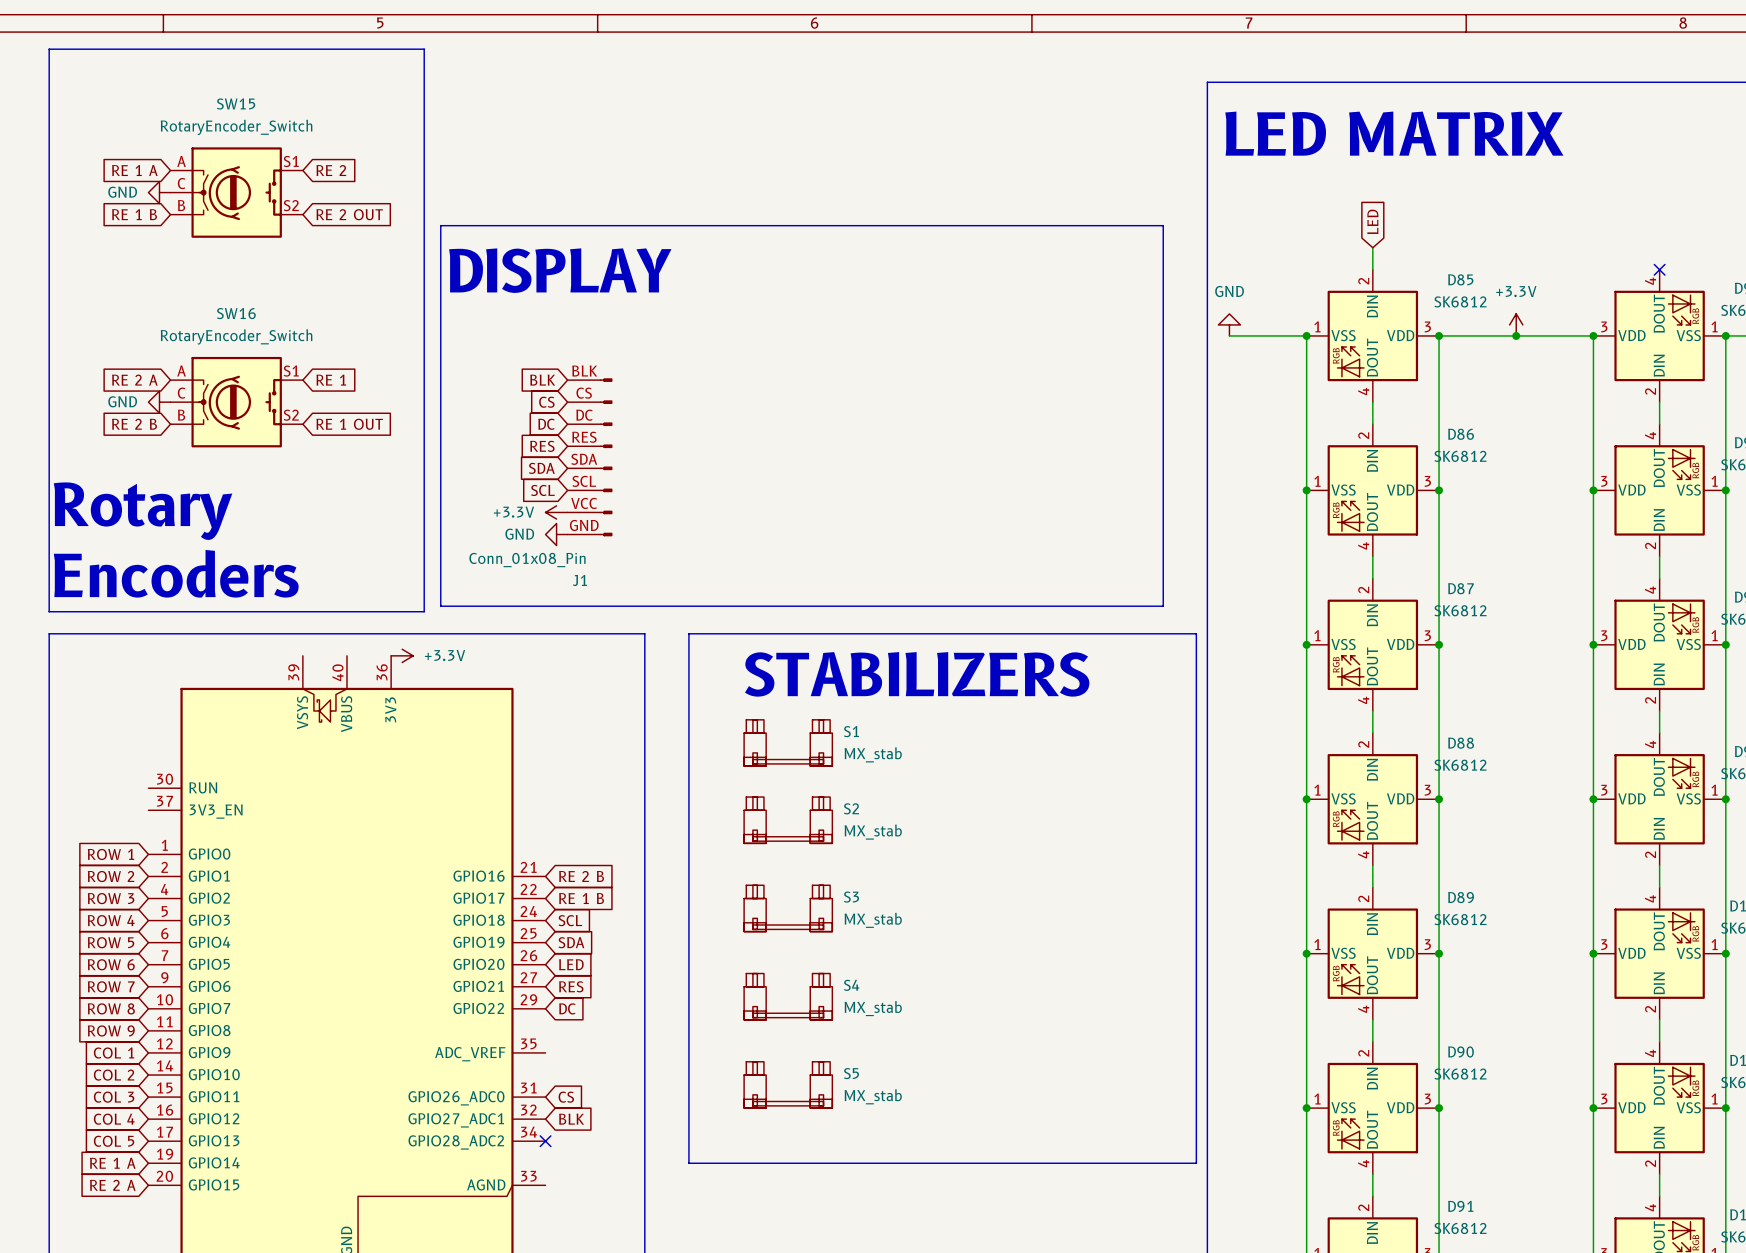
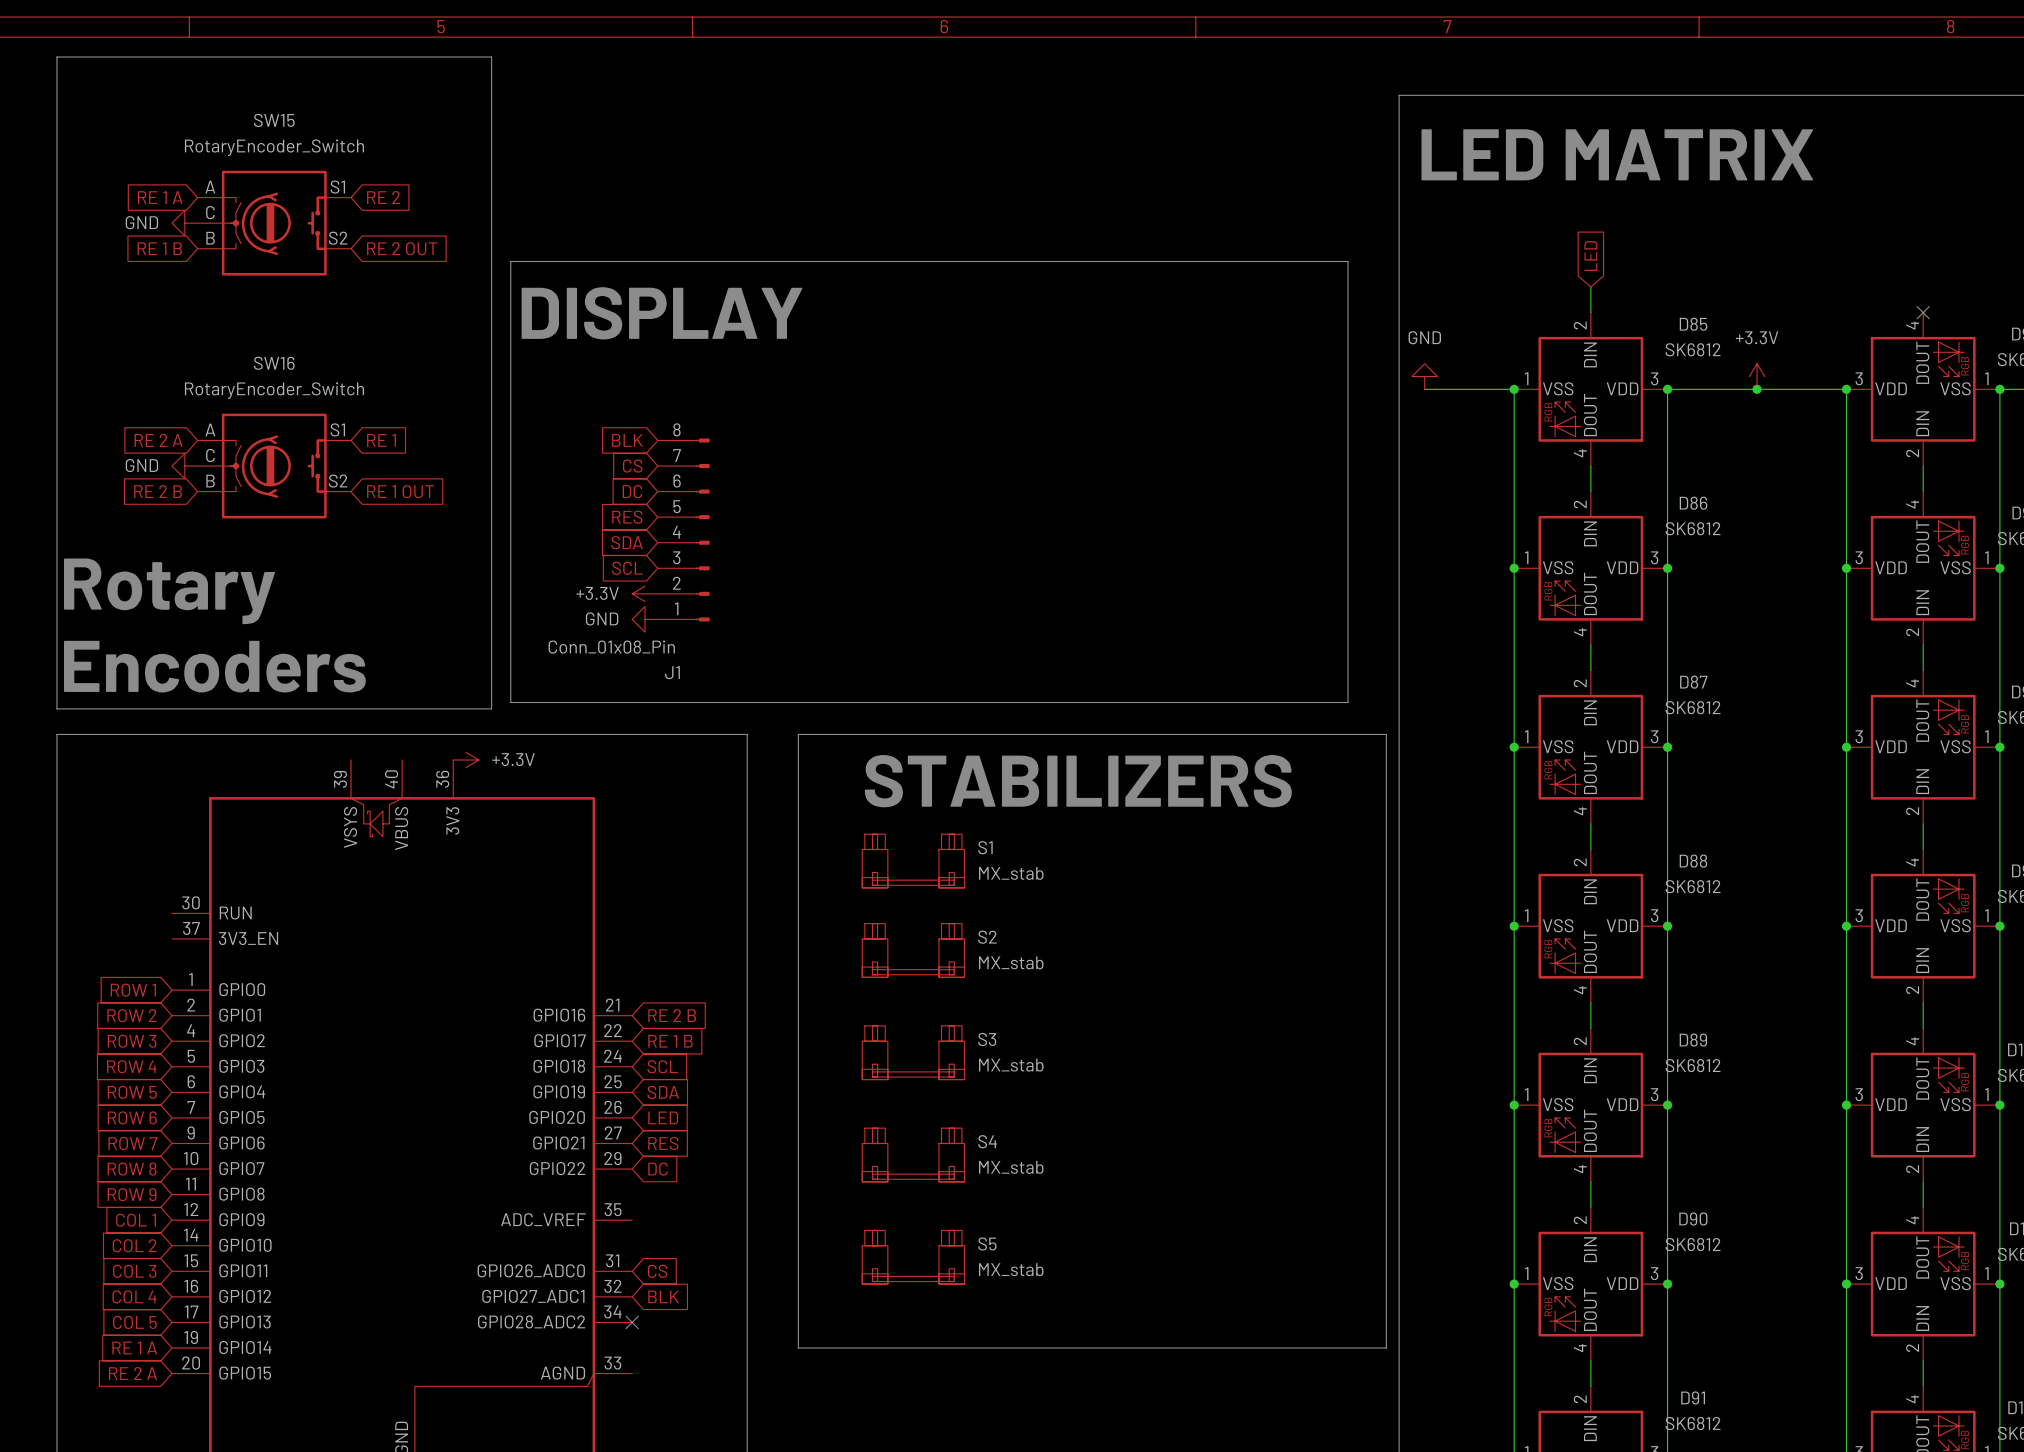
J1 pin number: BLK (584, 370) -> 8 (676, 429)
J1 pin number: CS (584, 393) -> 7 (677, 455)
J1 pin number: DC (584, 415) -> 6 (677, 481)
J1 pin number: RES (584, 437) -> 5 (677, 506)
J1 pin number: SDA (584, 459) -> 4 (676, 532)
J1 pin number: SCL (584, 481) -> 3 (676, 557)
J1 pin number: VCC (584, 503) -> 2 (676, 583)
J1 pin number: GND (584, 525) -> 1 (676, 608)

